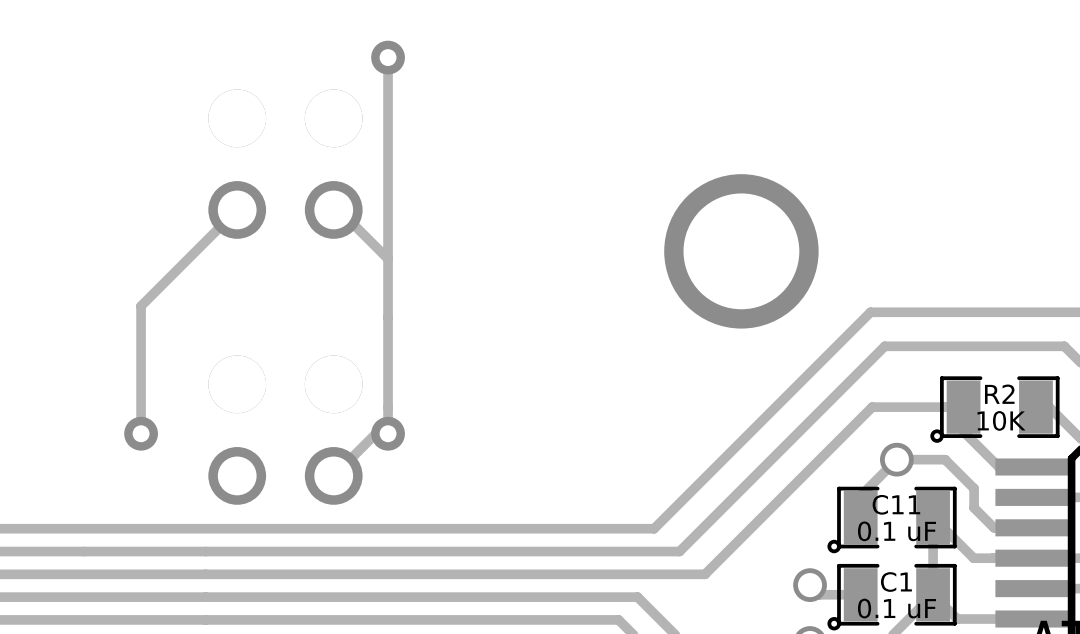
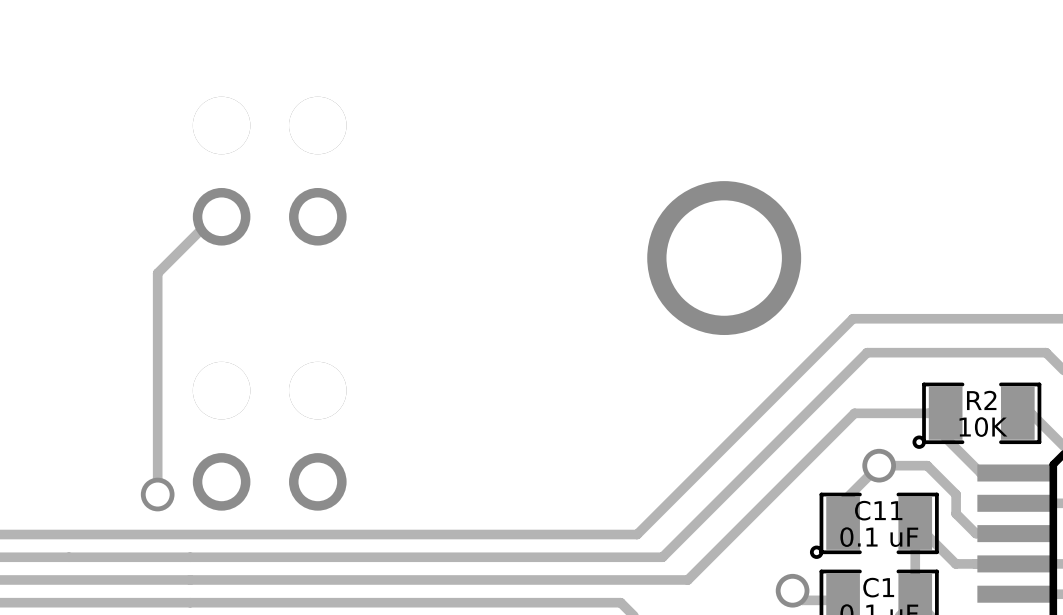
track: (388, 57) (388, 433) (375, 433) (333, 475) -> none
via: (388, 57) -> none
track: (237, 209) (141, 306) (141, 433) -> (221, 216) (214, 216) (157, 273) (157, 494)
track: (333, 209) (339, 209) (388, 258) -> none
via: (141, 433) -> none
via: (388, 433) -> none
via: none -> (157, 494)

